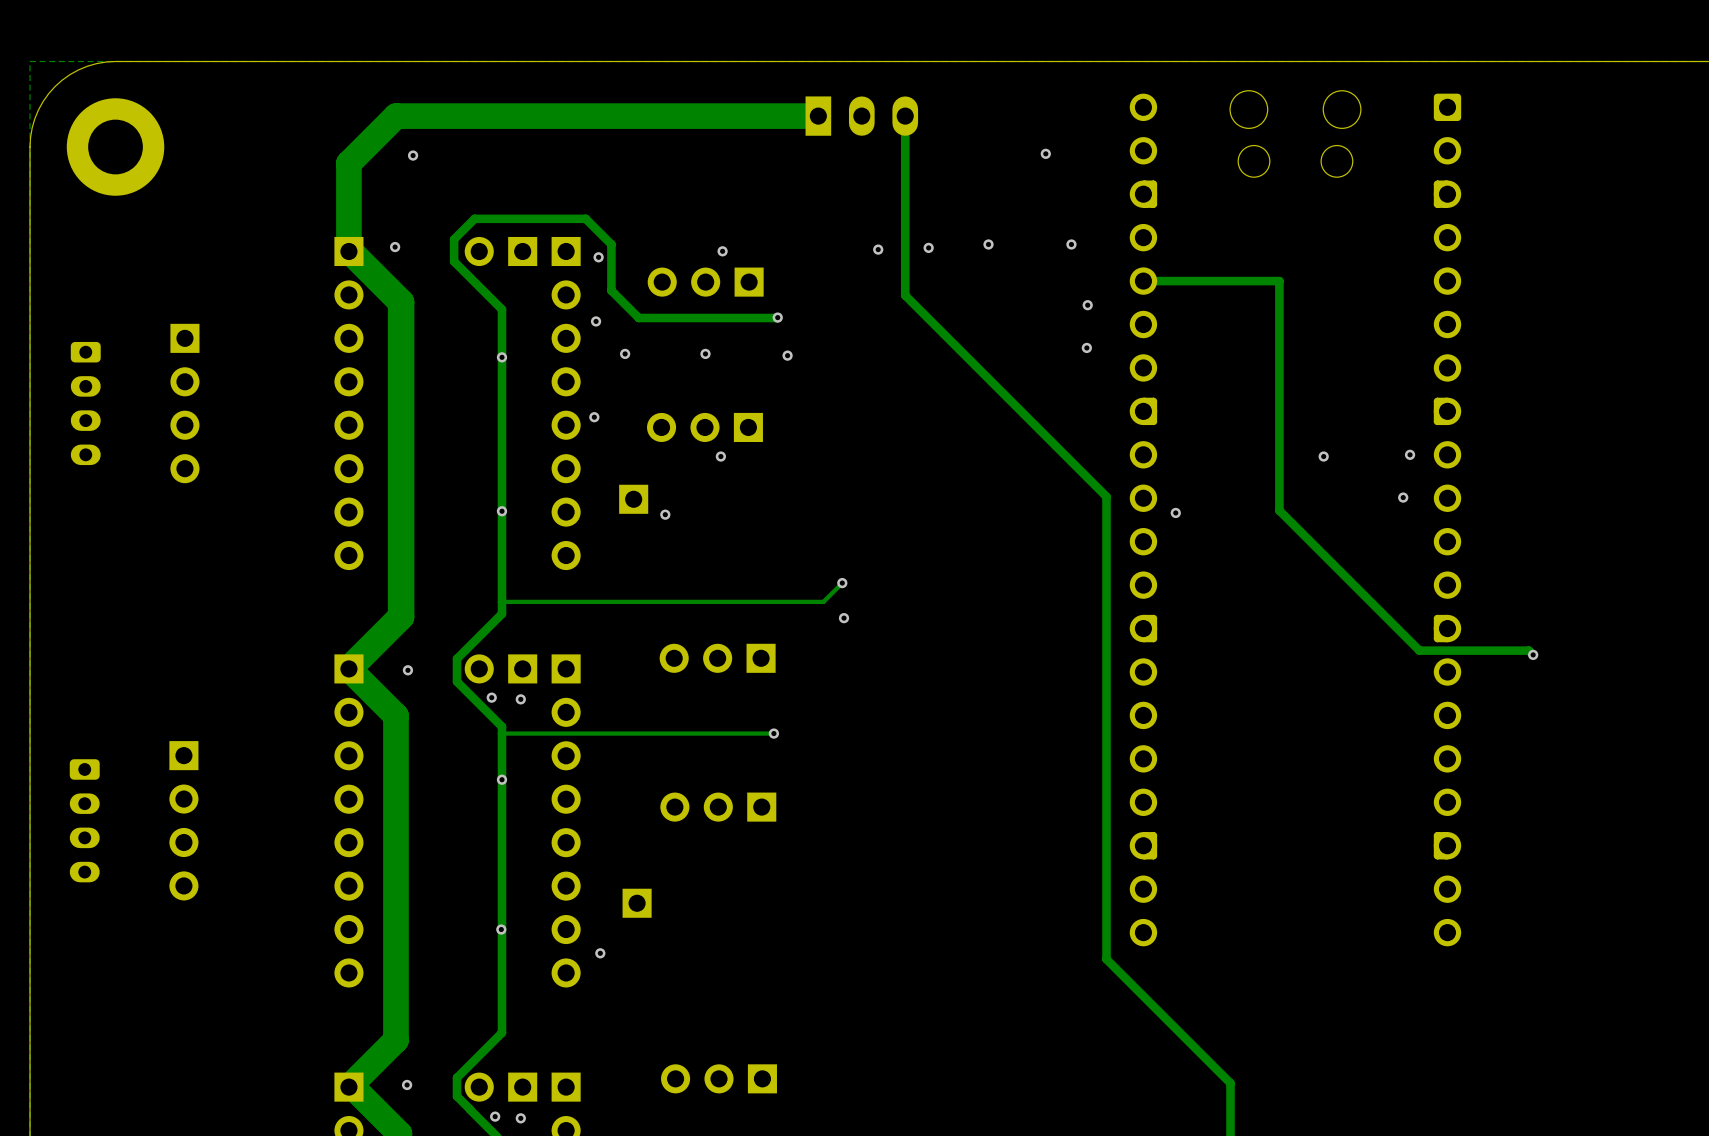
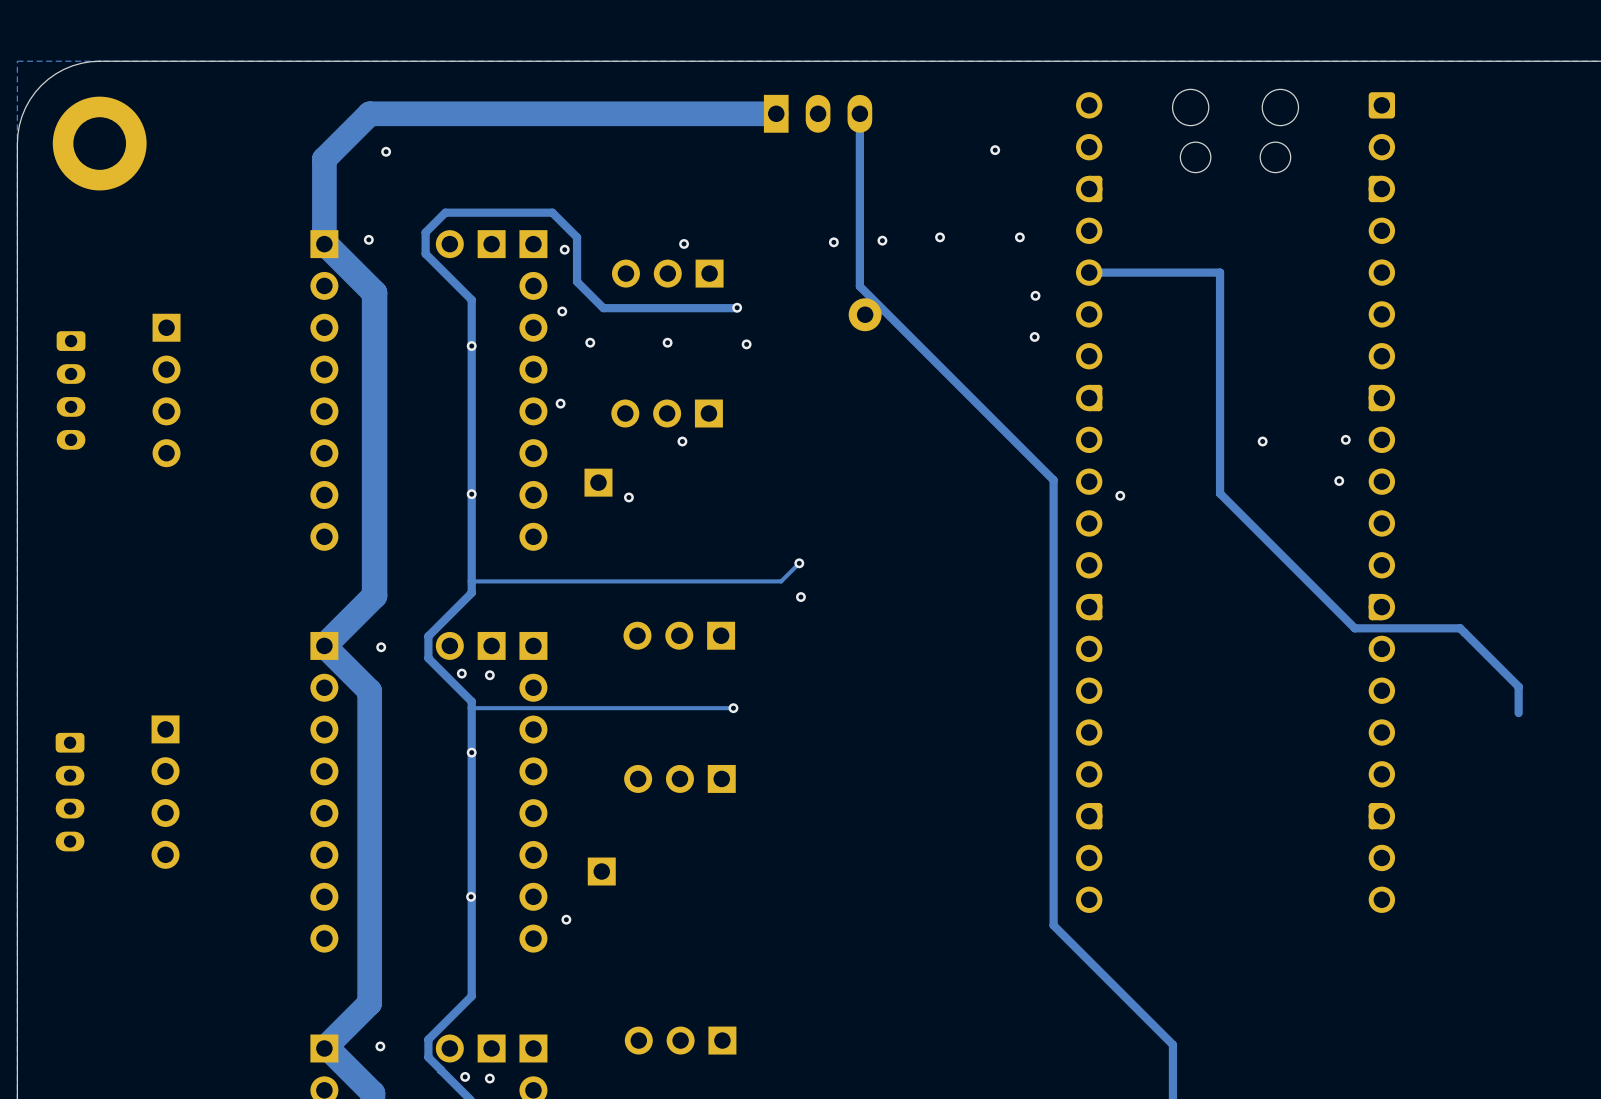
part: none -> (865, 314)
track: none -> (1464, 632) (1518, 686) (1518, 713)
via: (1533, 654) -> none

